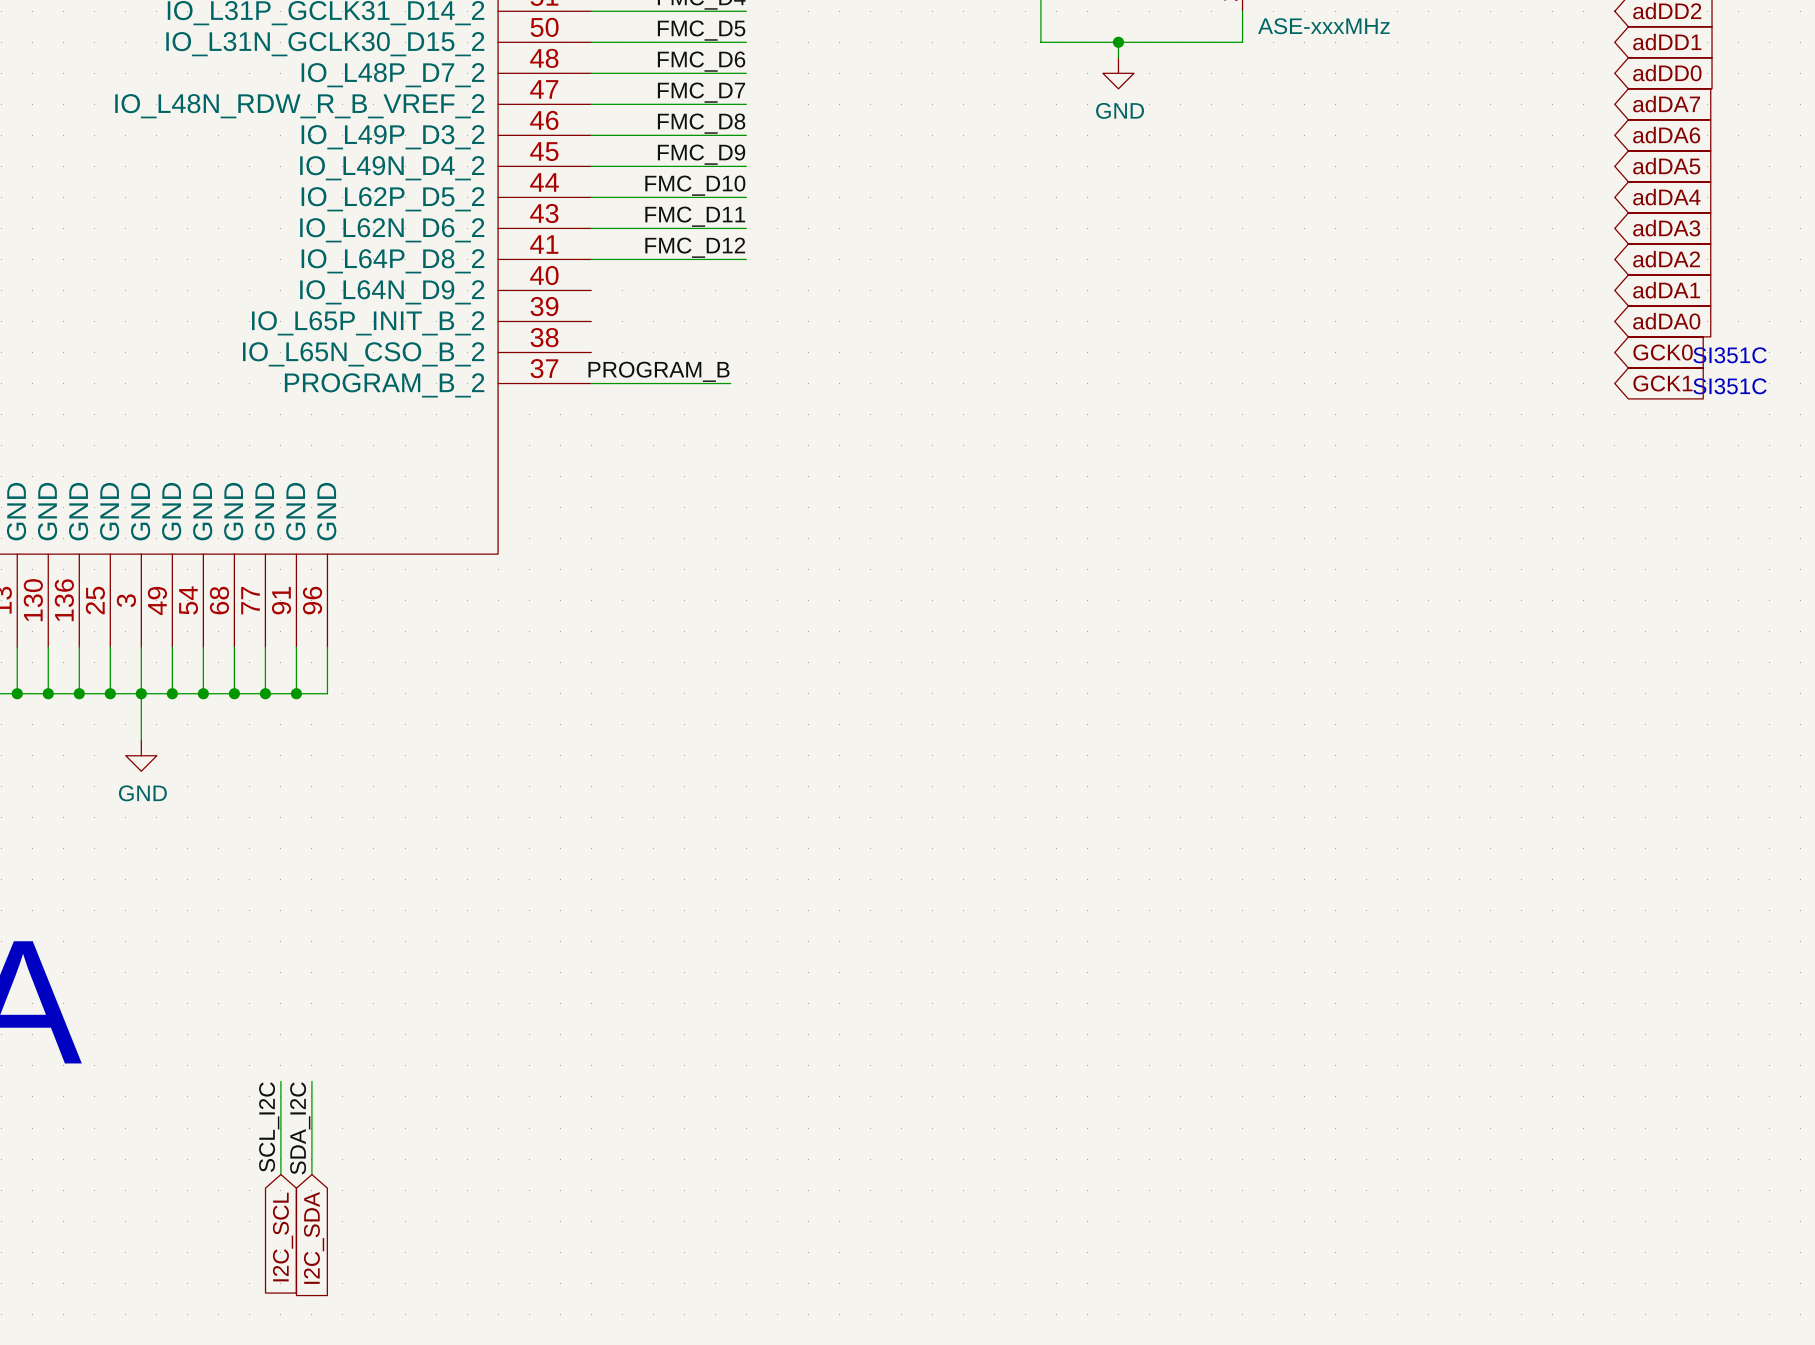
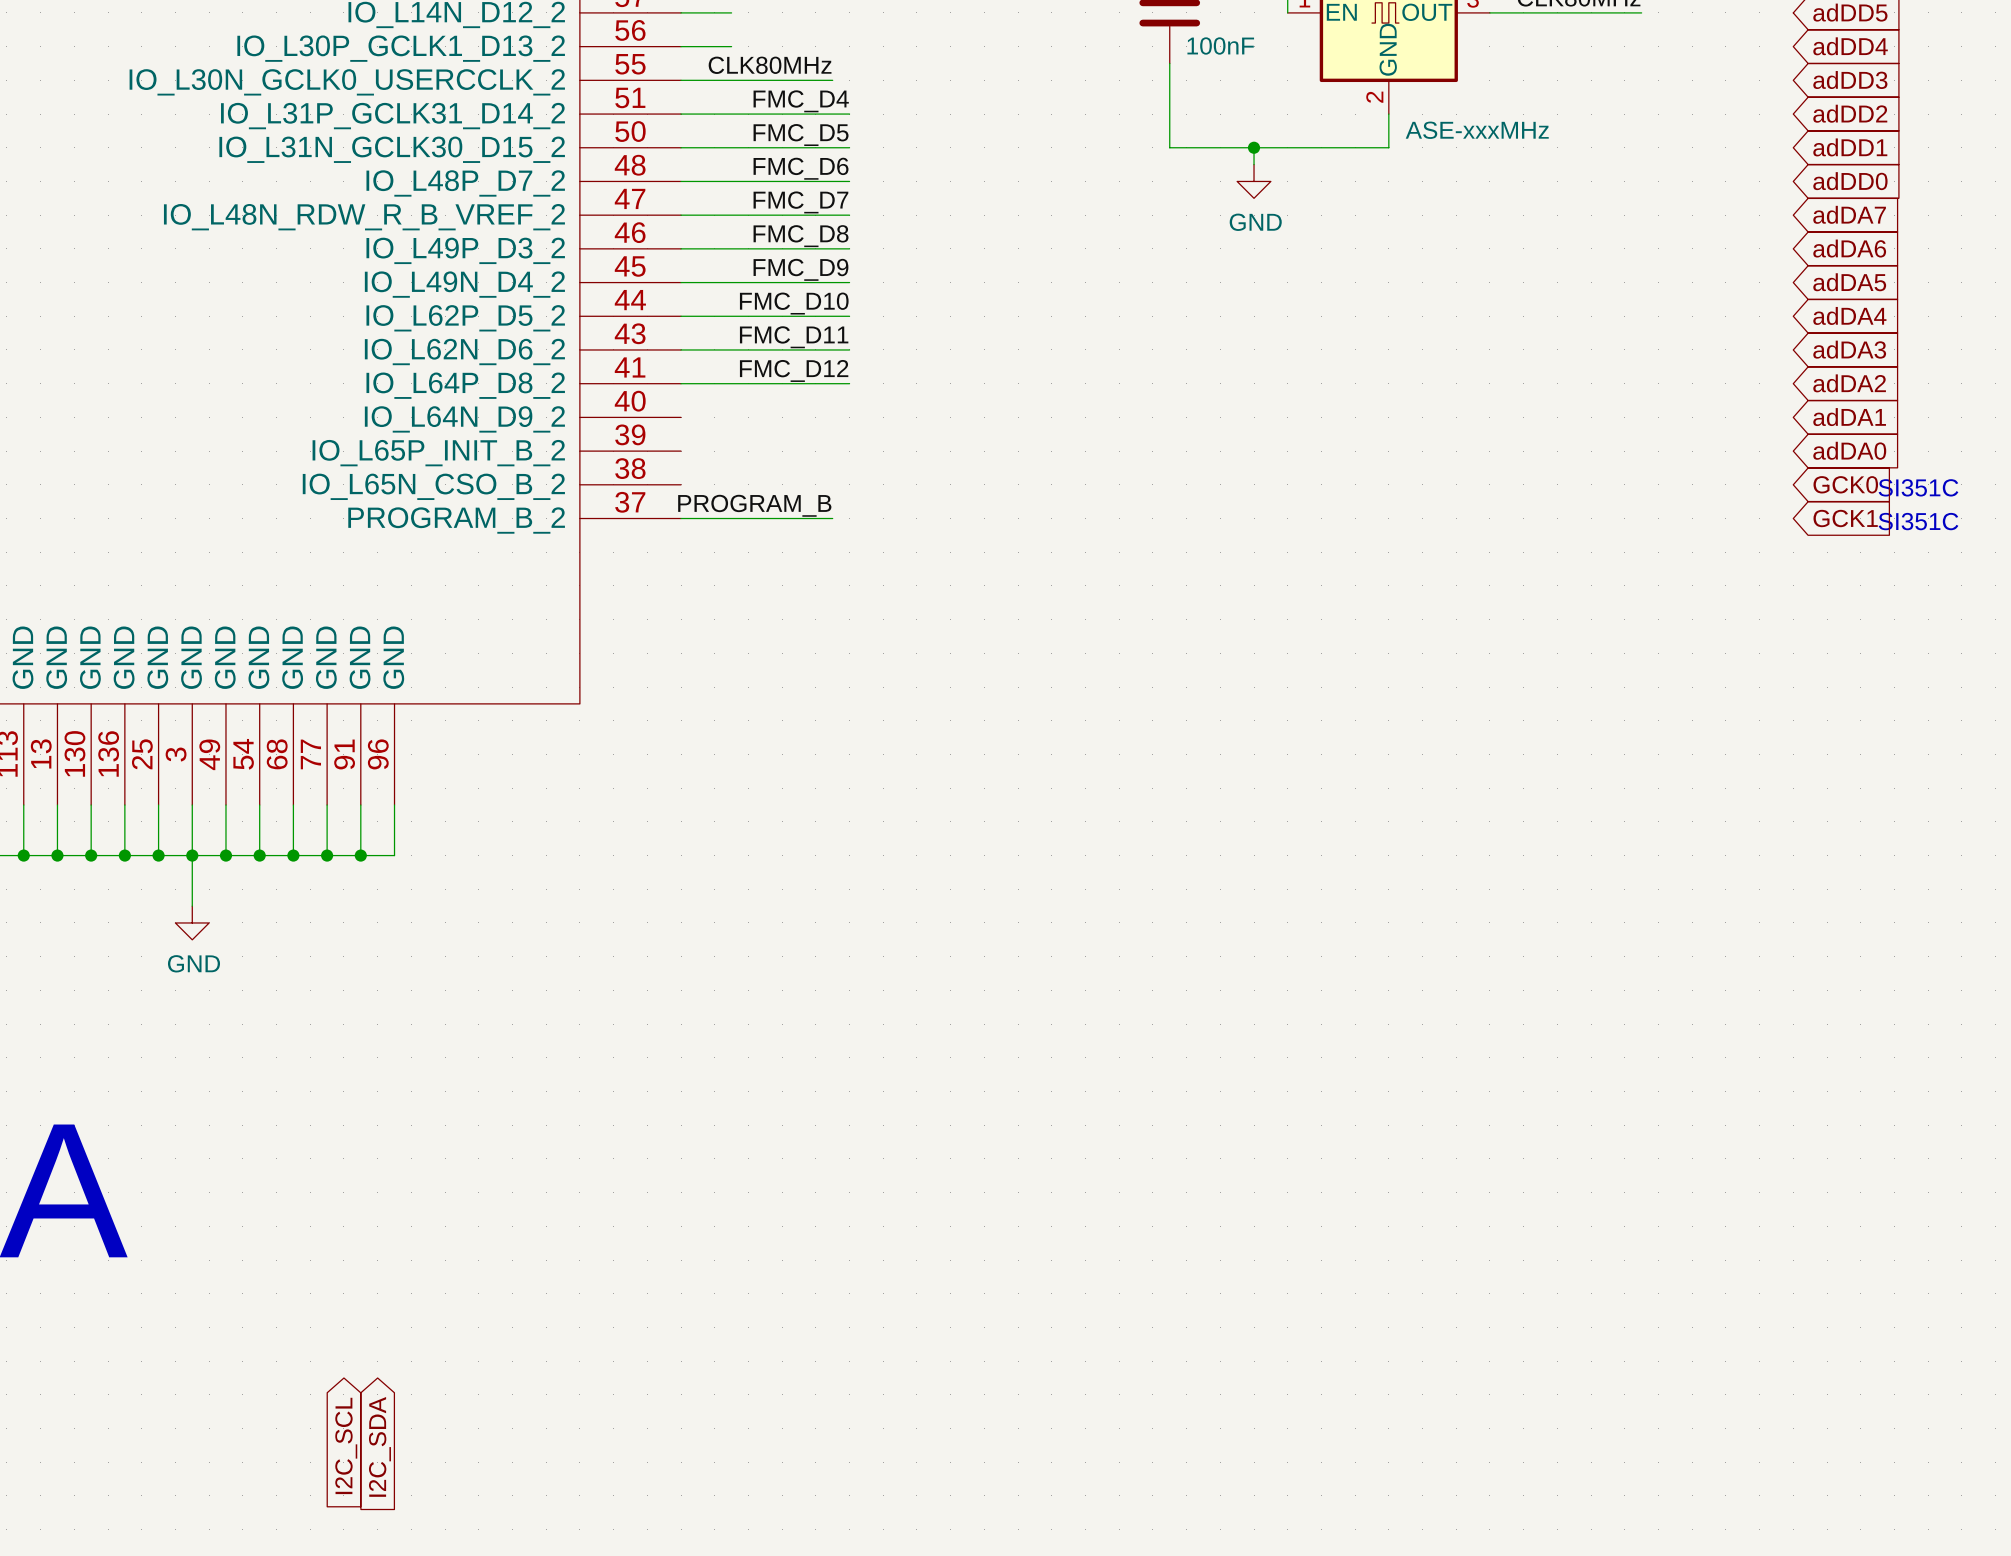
wire: (280, 1081) (280, 1174) -> none
wire: (311, 1081) (311, 1174) -> none
label: SCL_I2C (269, 1127) -> none
label: SDA_I2C (300, 1128) -> none

